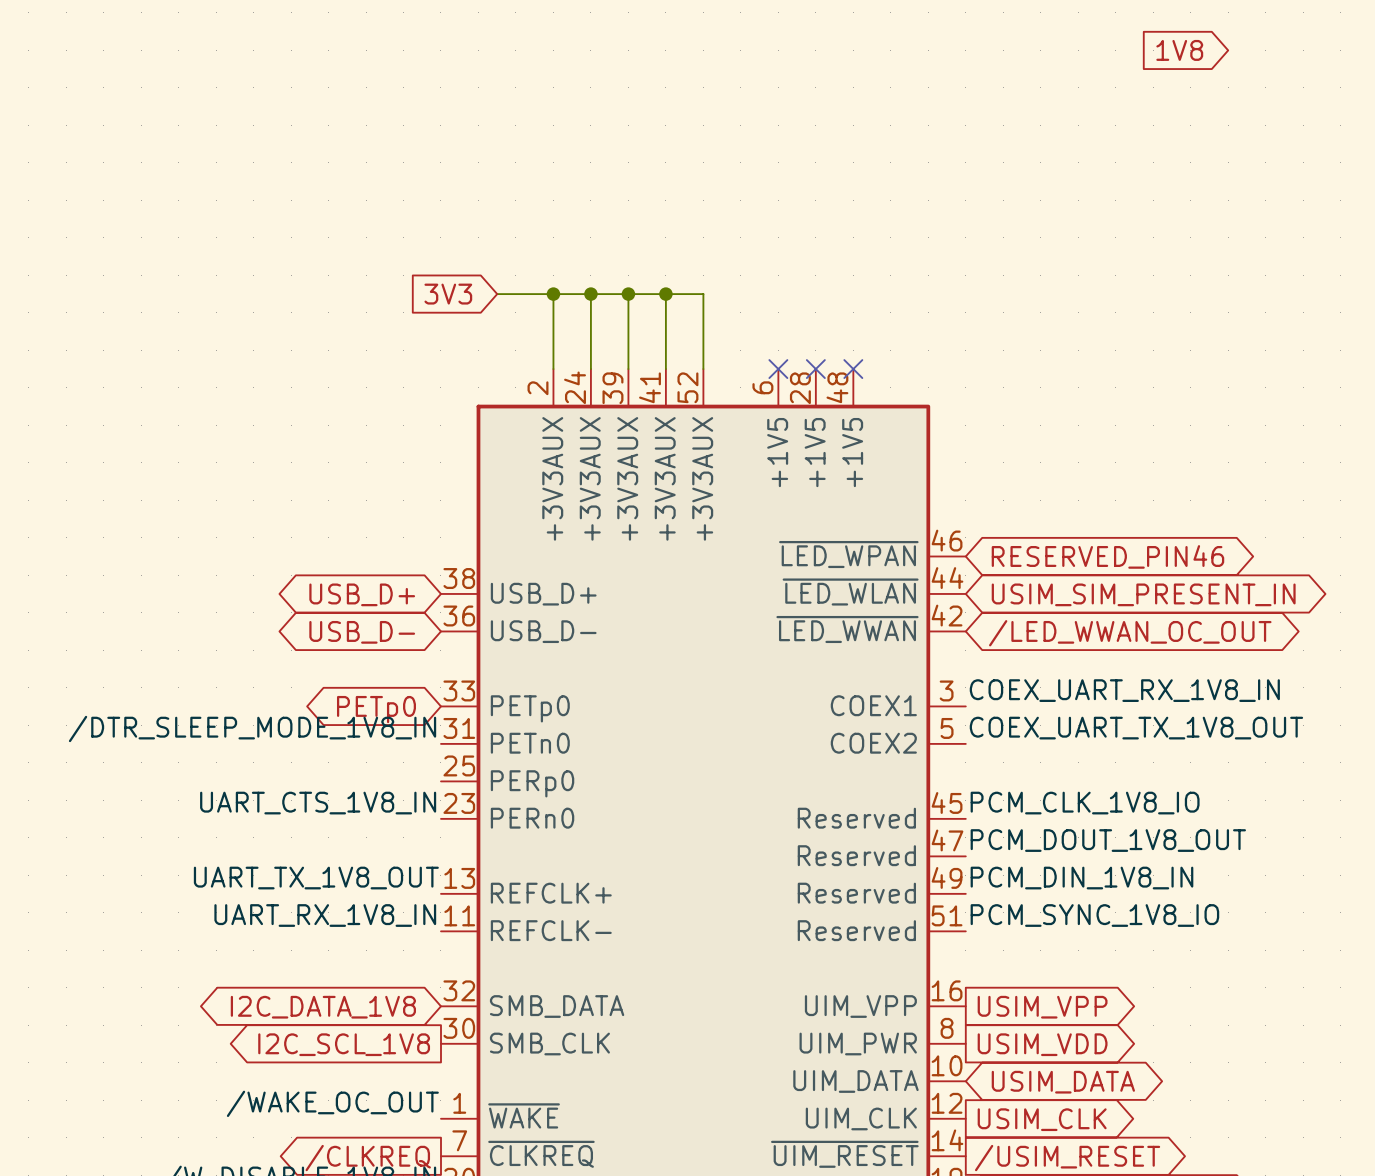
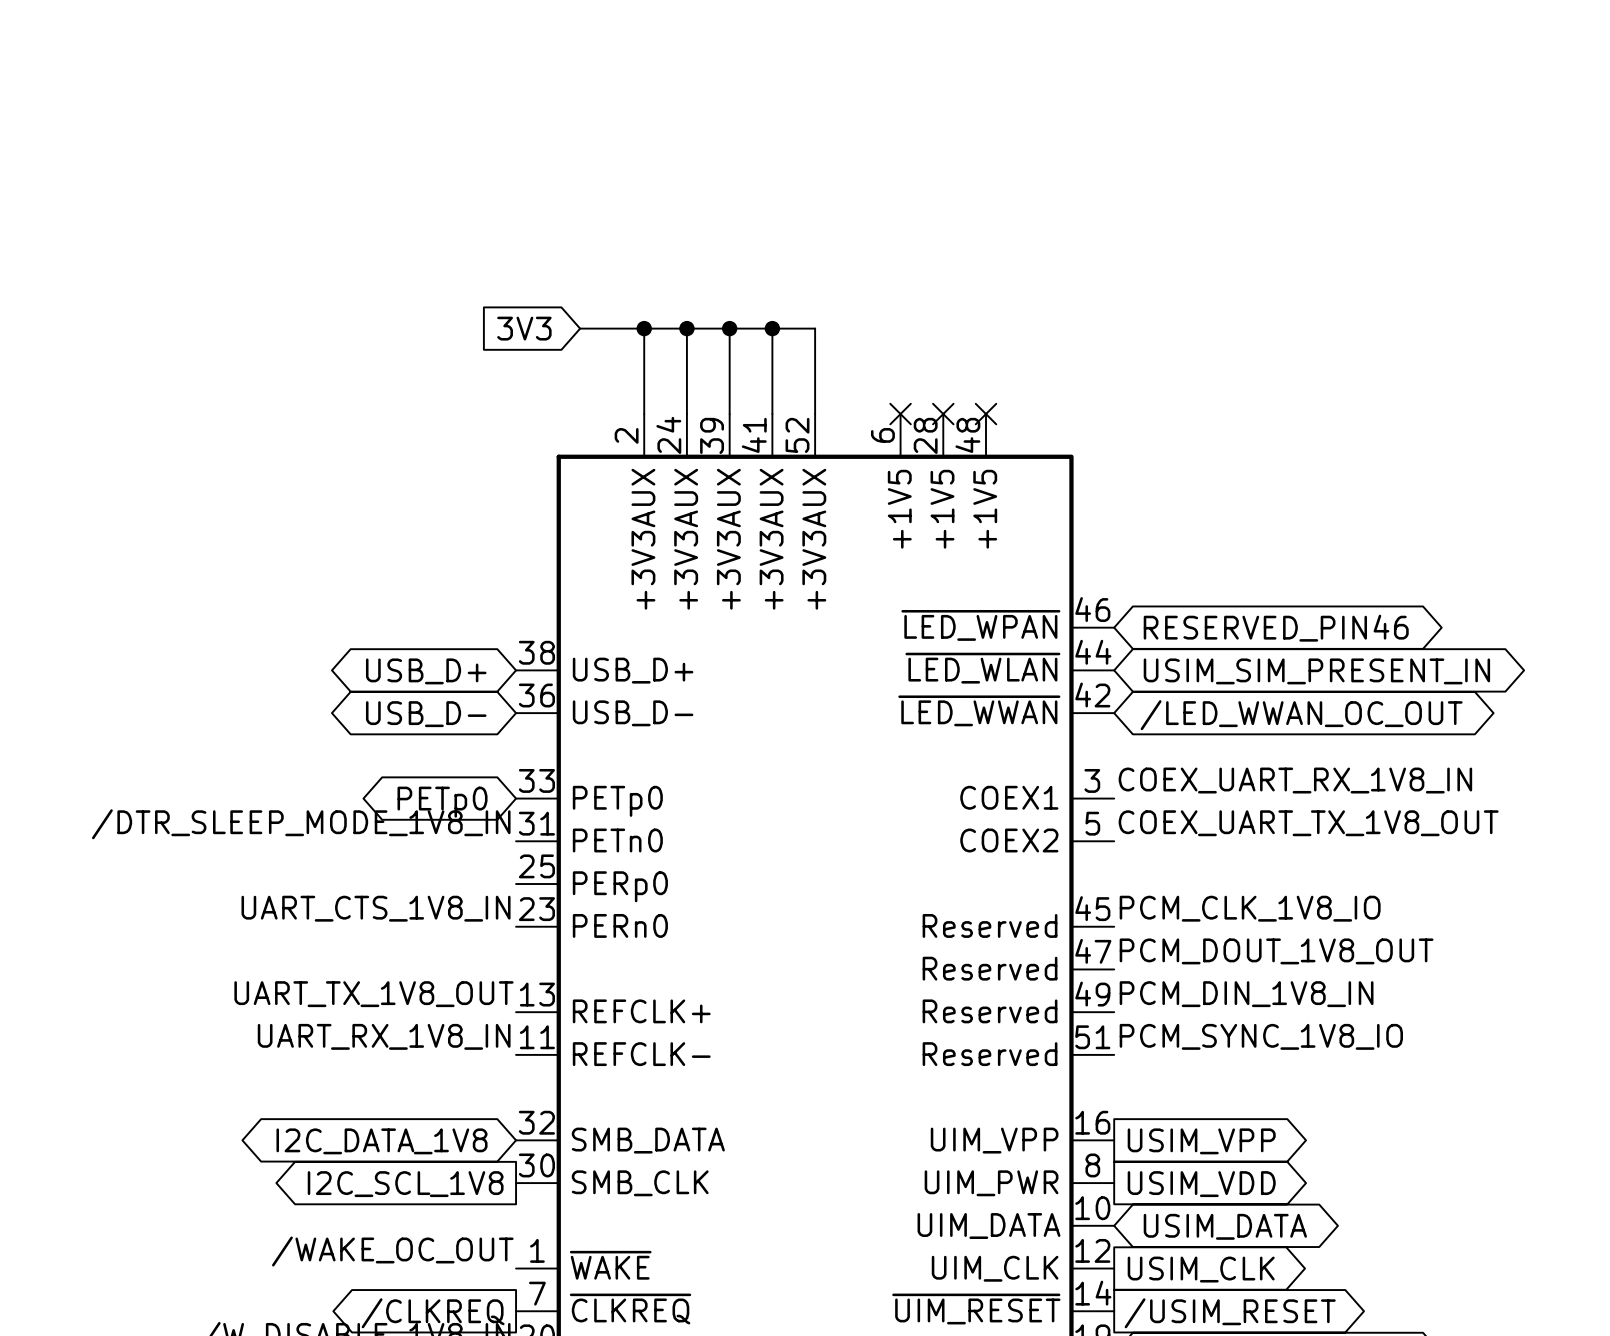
global label: 1V8 (1179, 50) -> none

